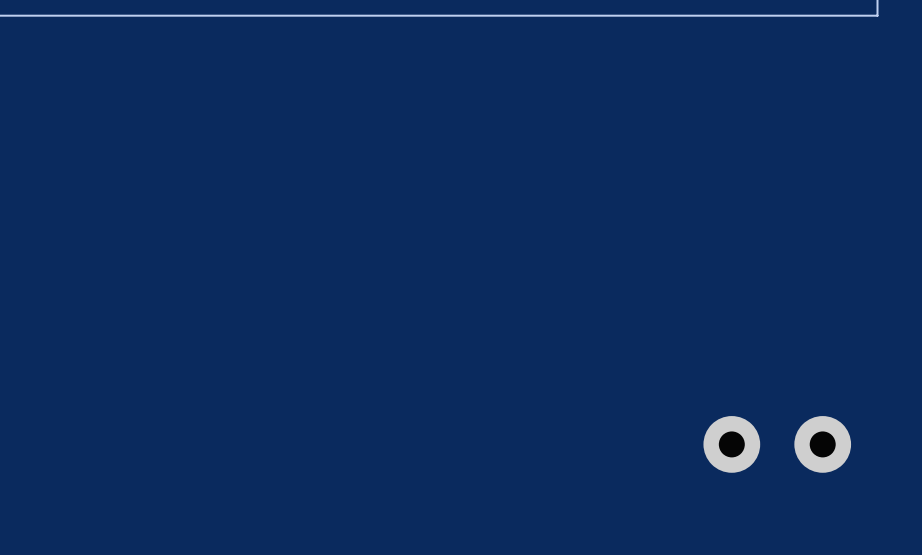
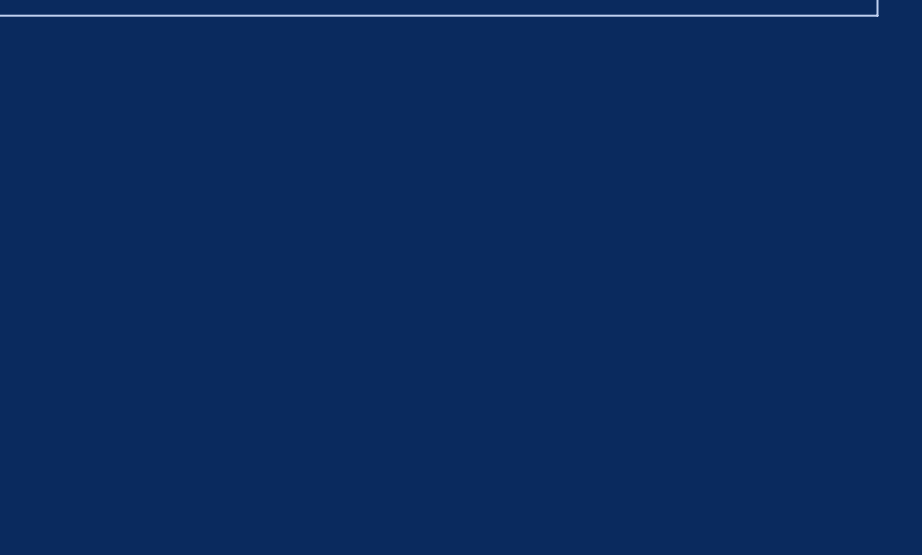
part: (777, 444) -> none

